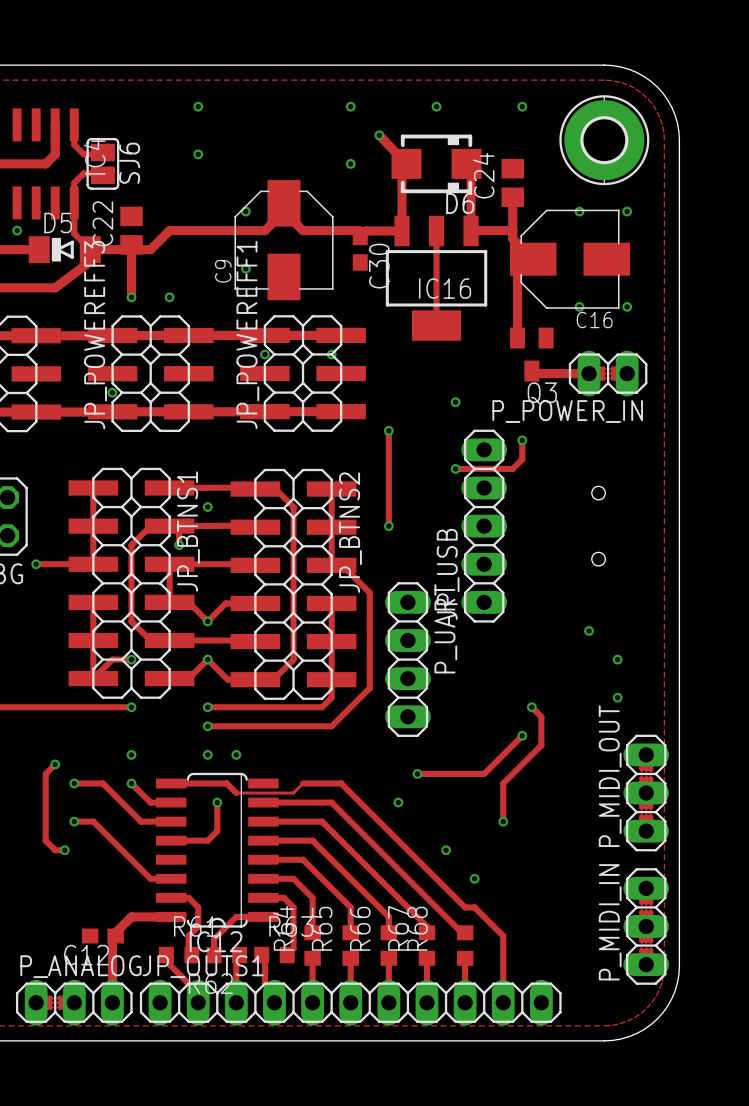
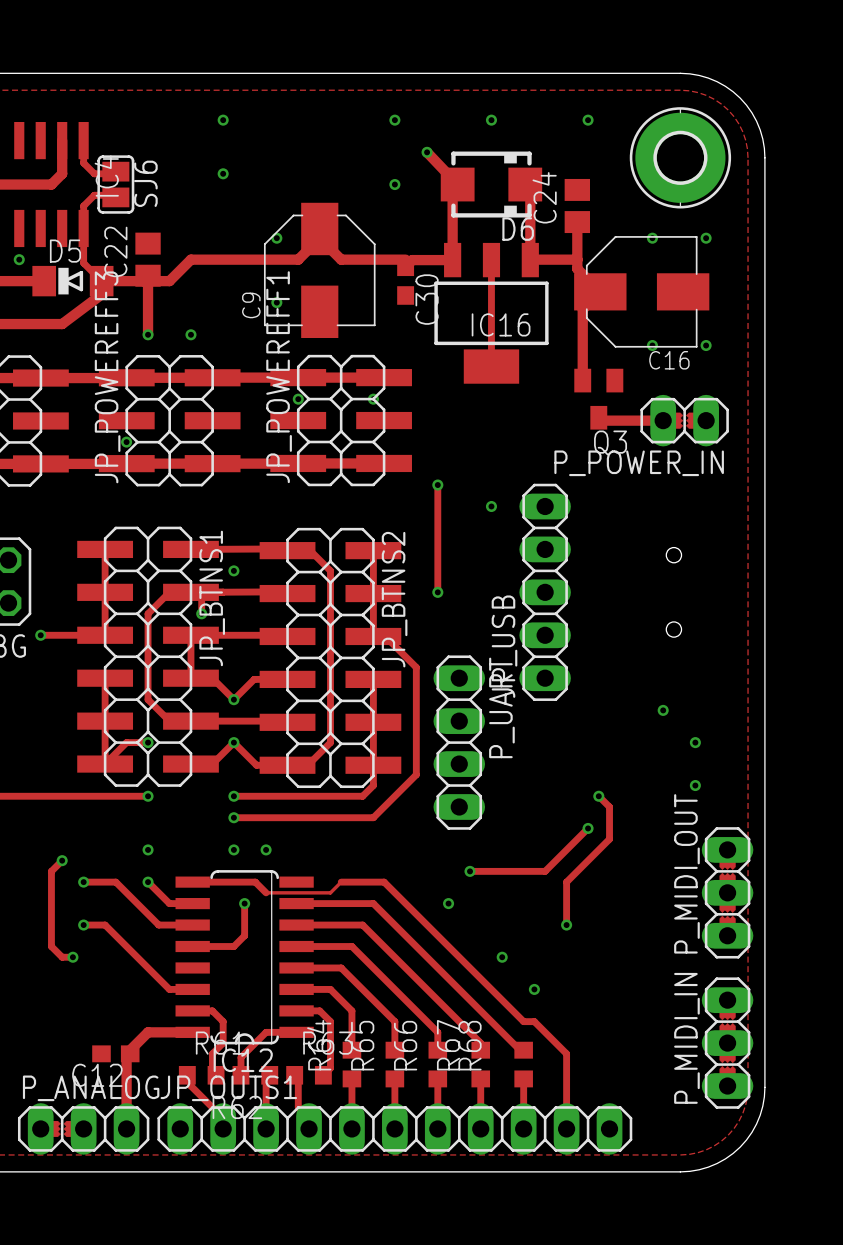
via: (455, 402) -> none
track: (522, 440) (522, 459) (512, 468) (455, 468) -> none
via: (522, 440) -> none
via: none -> (491, 506)
via: (455, 468) -> none

